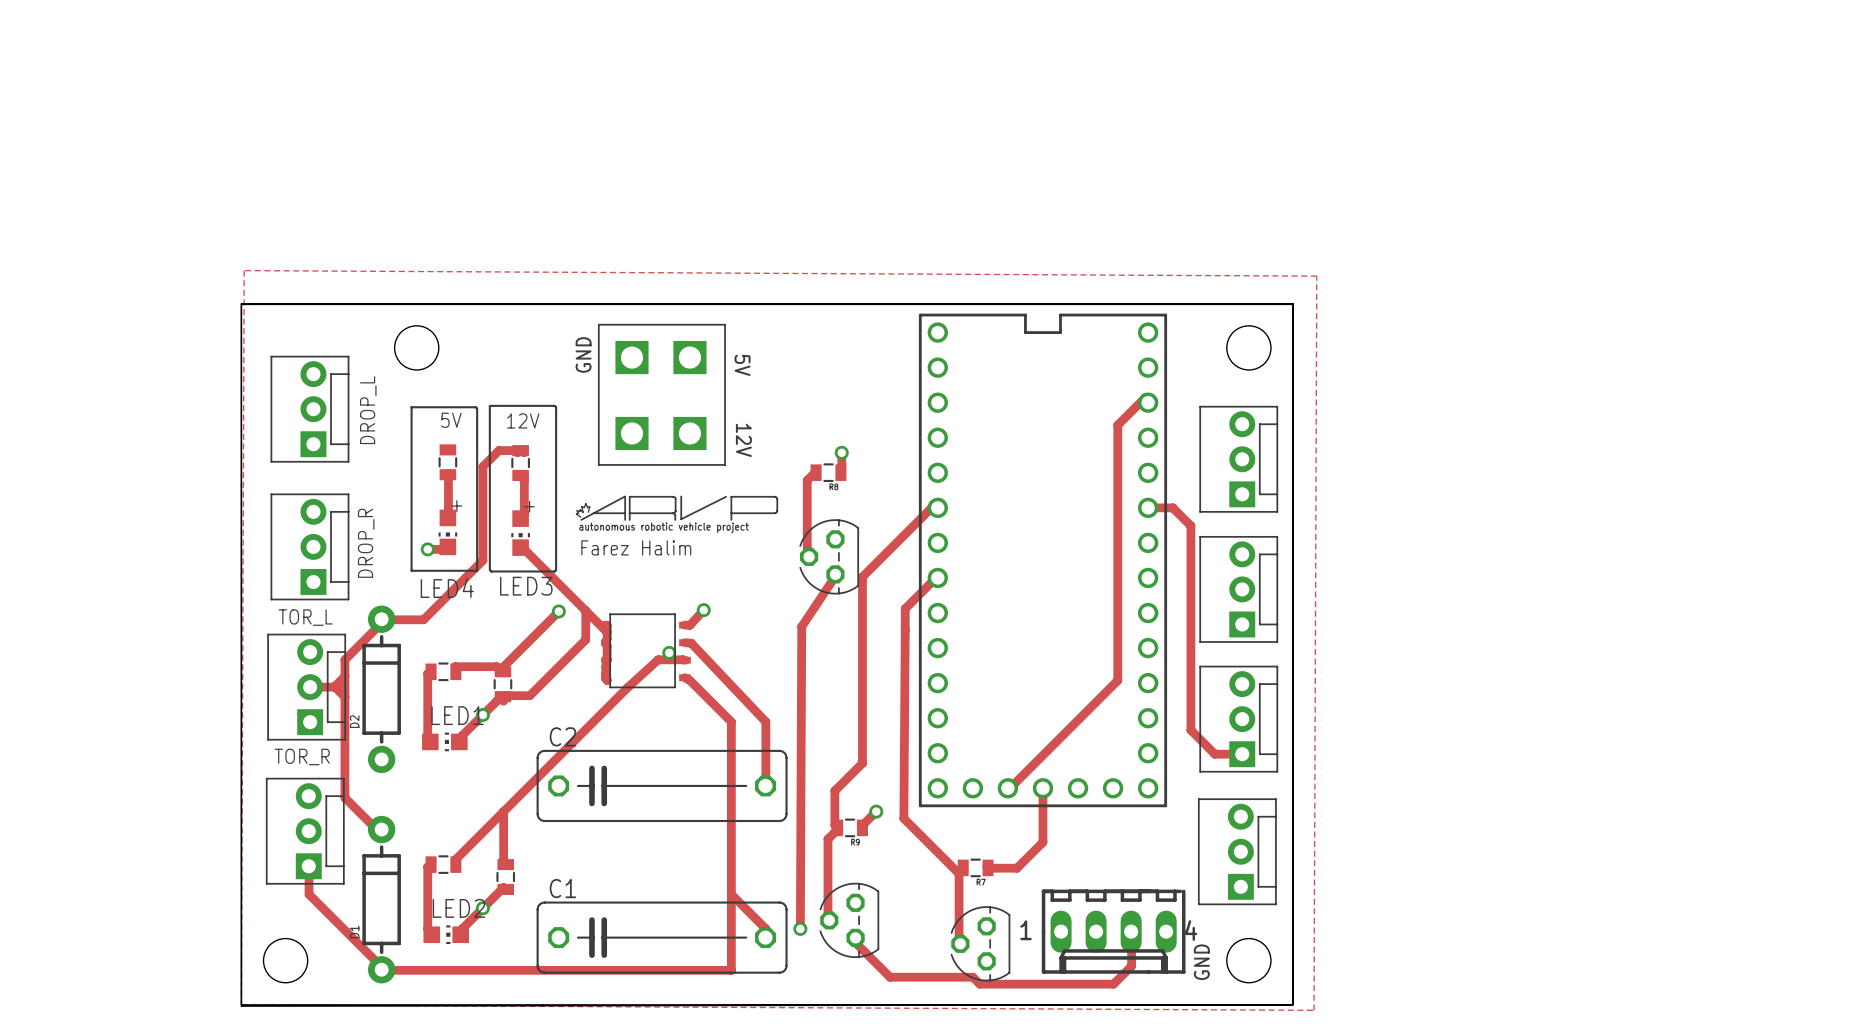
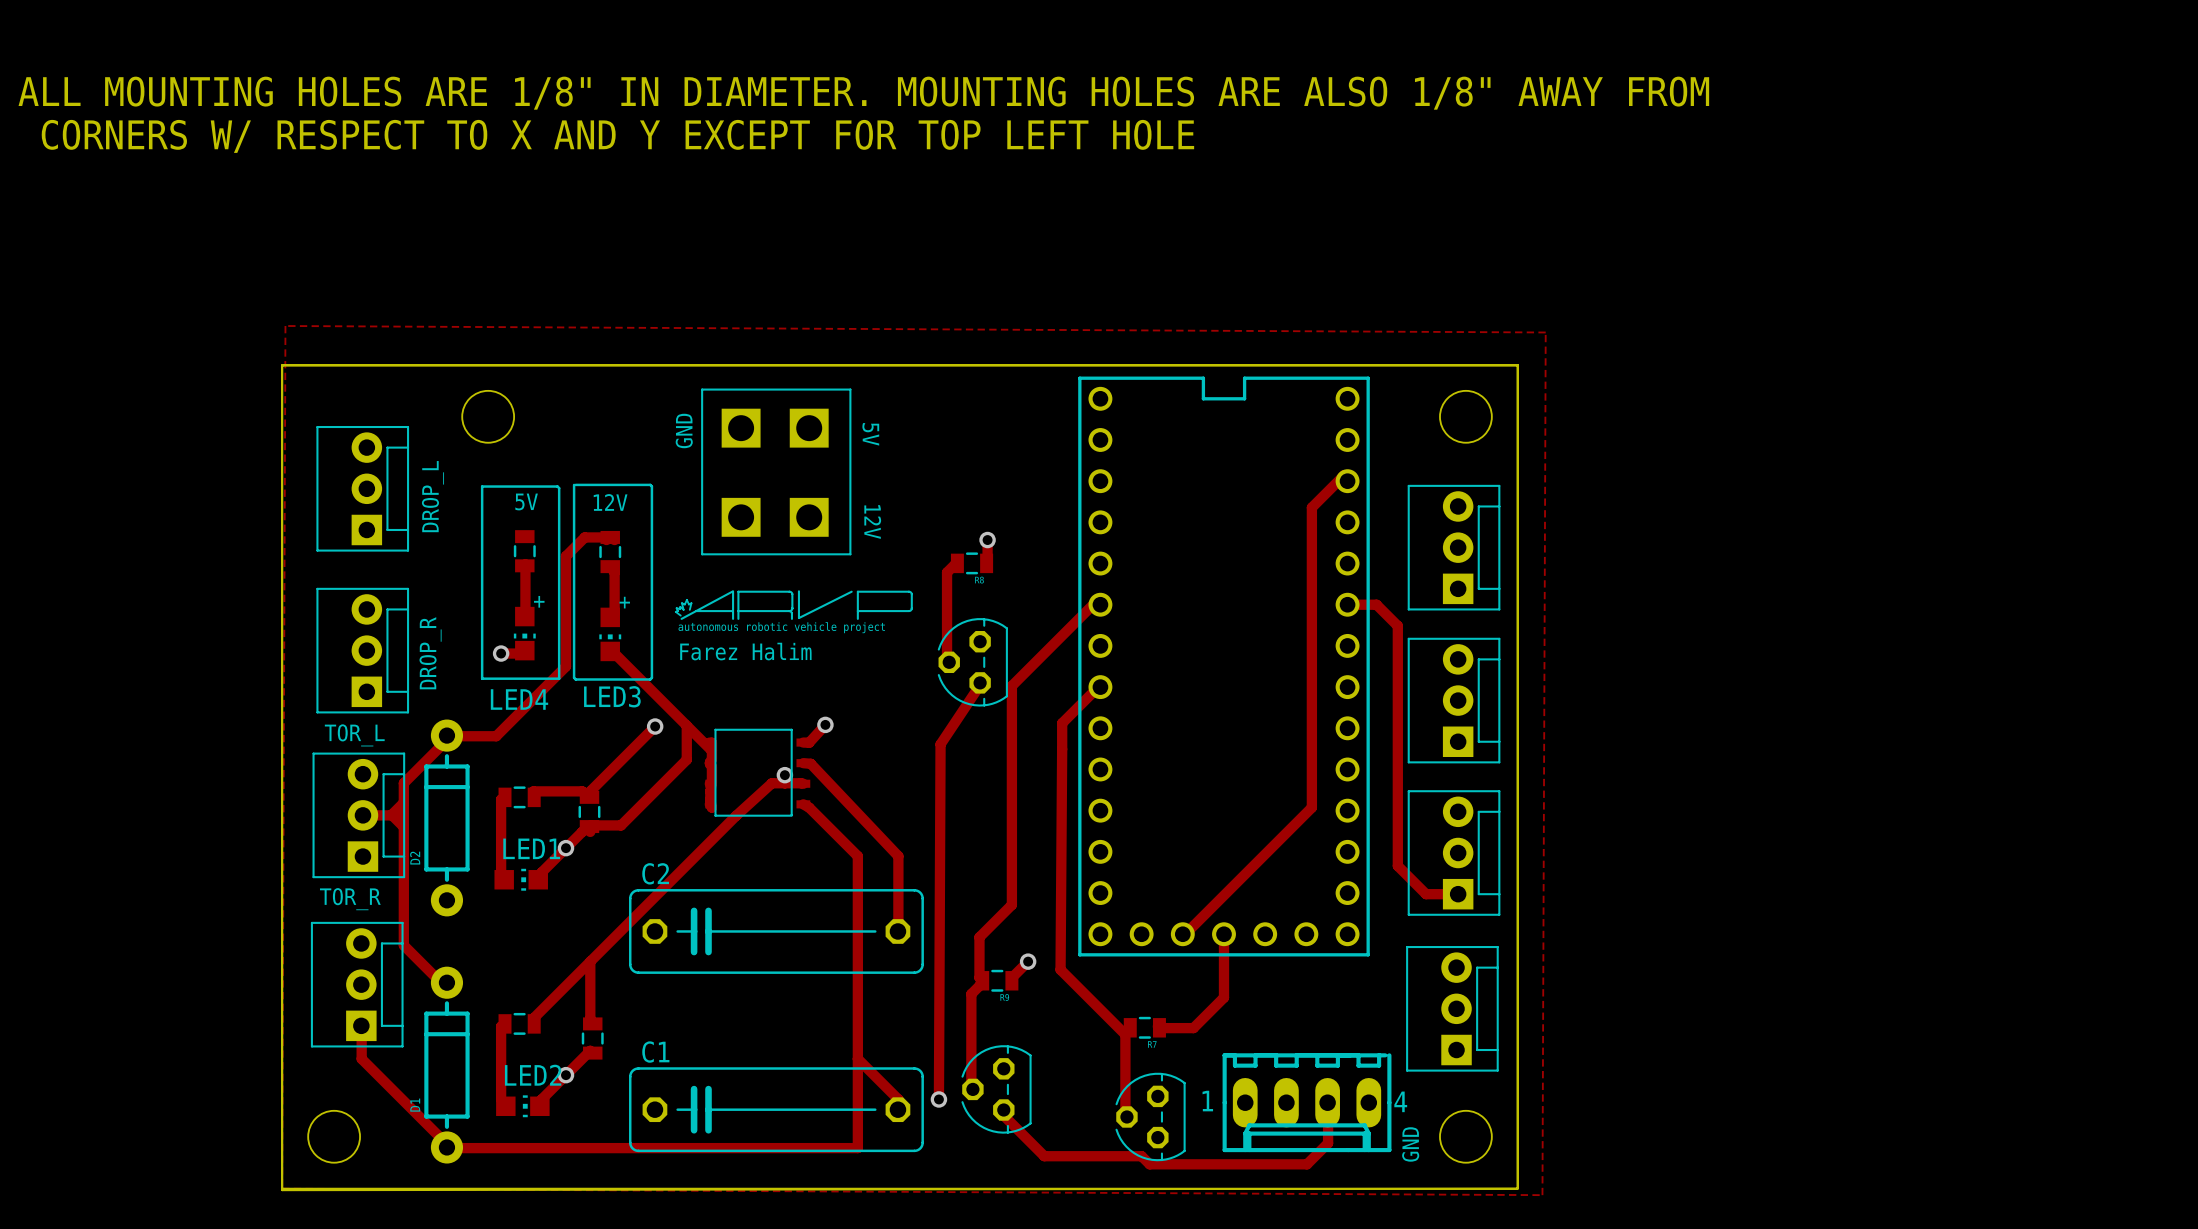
text: none -> ALL MOUNTING HOLES ARE 1/8" IN DIAMETER. MOUNTING HOLES ARE ALSO 1/8" AWAY FROM (863, 93)
text: none -> CORNERS W/ RESPECT TO X AND Y EXCEPT FOR TOP LEFT HOLE (617, 136)

